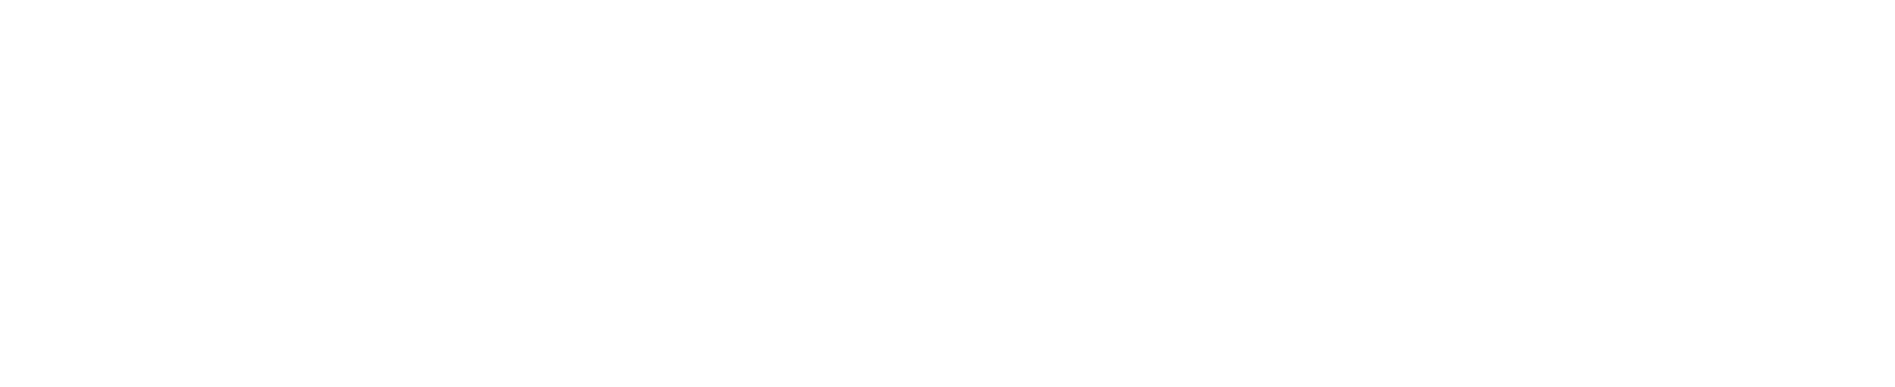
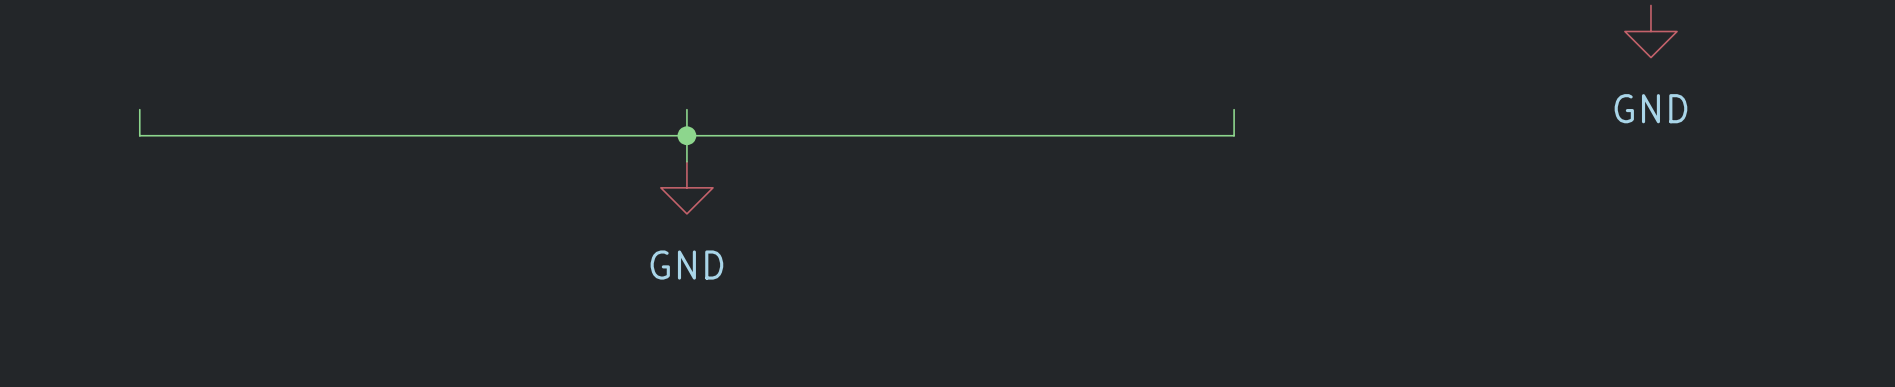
power symbol: none -> GND (1650, 31)
wire: none -> (139, 109) (139, 135) (1234, 135) (1234, 109)
wire: none -> (686, 109) (686, 161)
junction: none -> (686, 135)
power symbol: none -> GND (686, 187)

